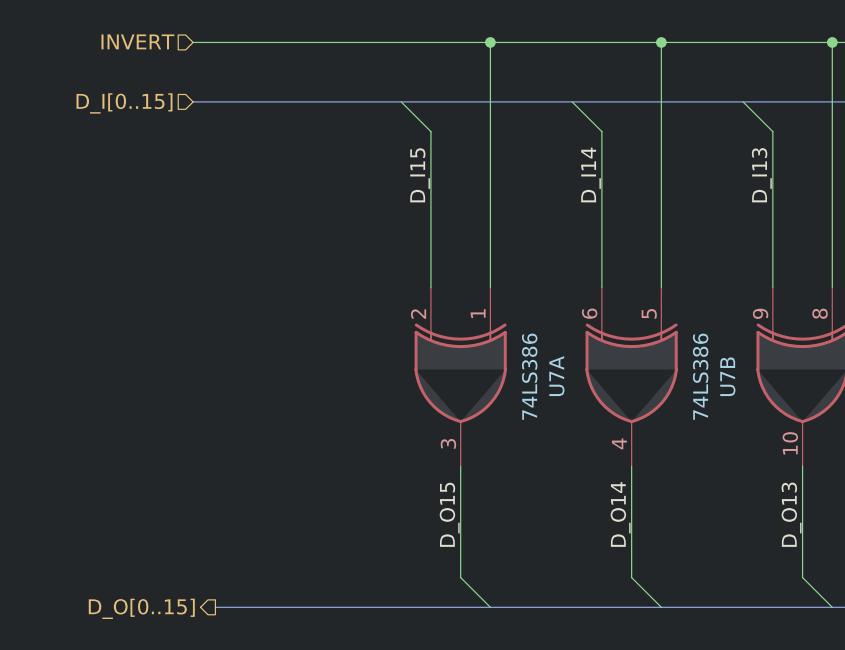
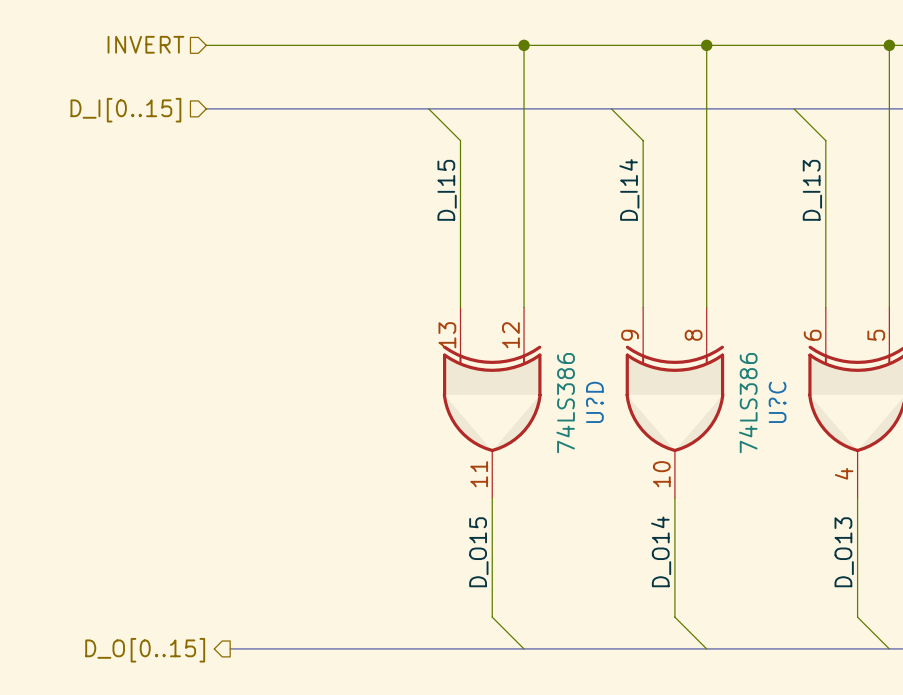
U7A pin number: 1 (478, 313) -> 12 (510, 335)
U7B pin number: 6 (589, 313) -> 9 (630, 335)
U7B pin number: 5 (649, 313) -> 8 (693, 335)
part pin number: 9 (760, 313) -> 6 (812, 335)
part pin number: 8 (820, 313) -> 5 (876, 335)
U7A pin number: 2 (418, 314) -> 13 (447, 335)
U7A name: U7A (556, 376) -> U?D (594, 402)
U7B name: U7B (727, 376) -> U?C (777, 402)
U7A pin number: 3 (448, 443) -> 11 (479, 474)
U7B pin number: 4 (619, 443) -> 10 (661, 474)
part pin number: 10 (790, 443) -> 4 (844, 473)

